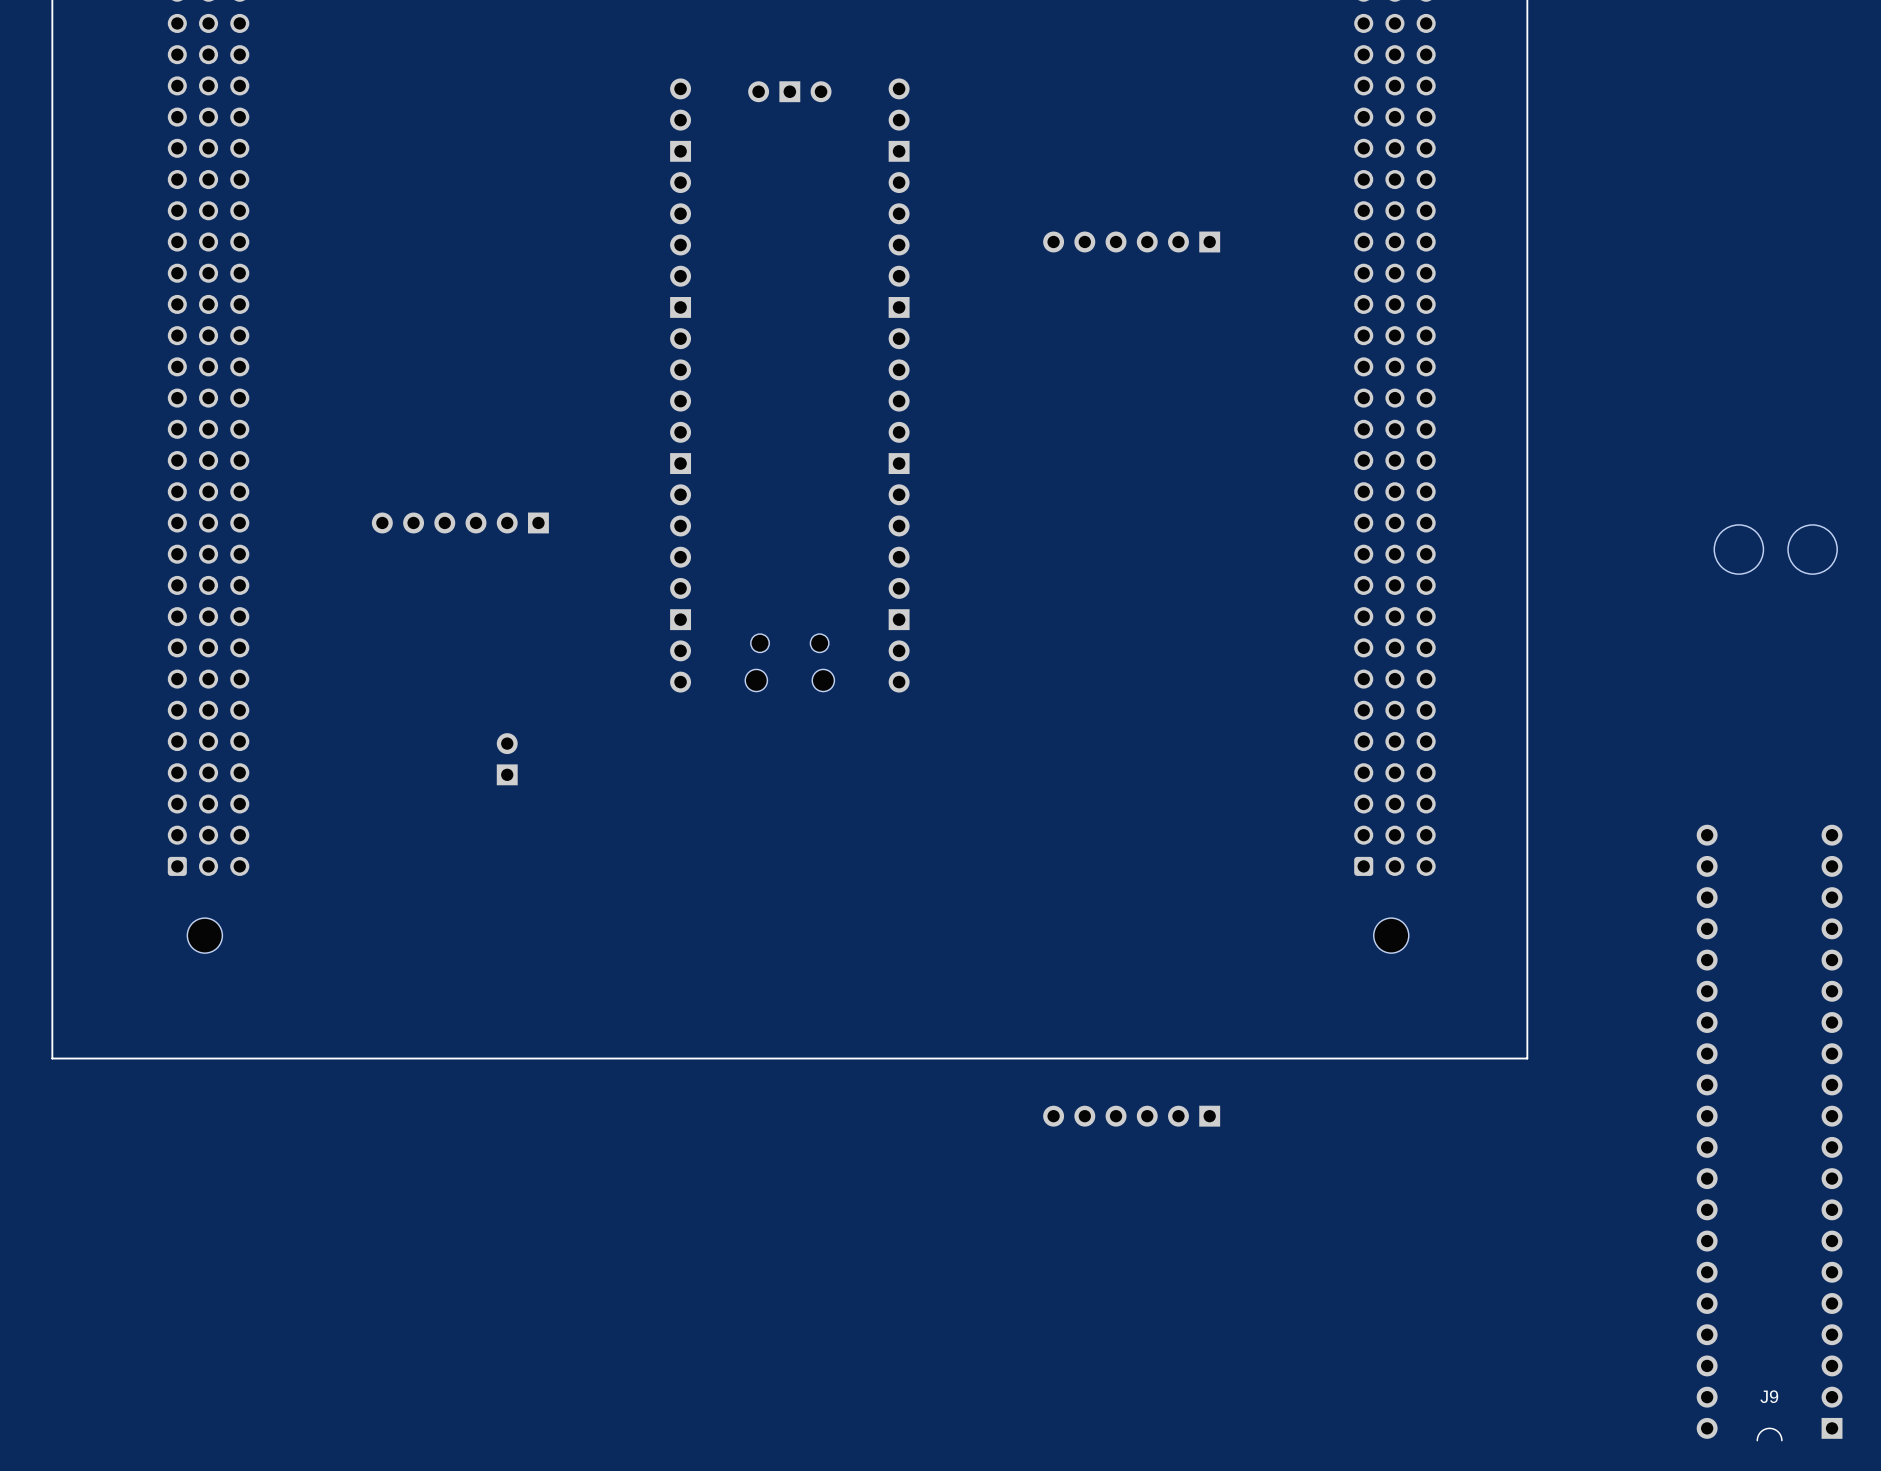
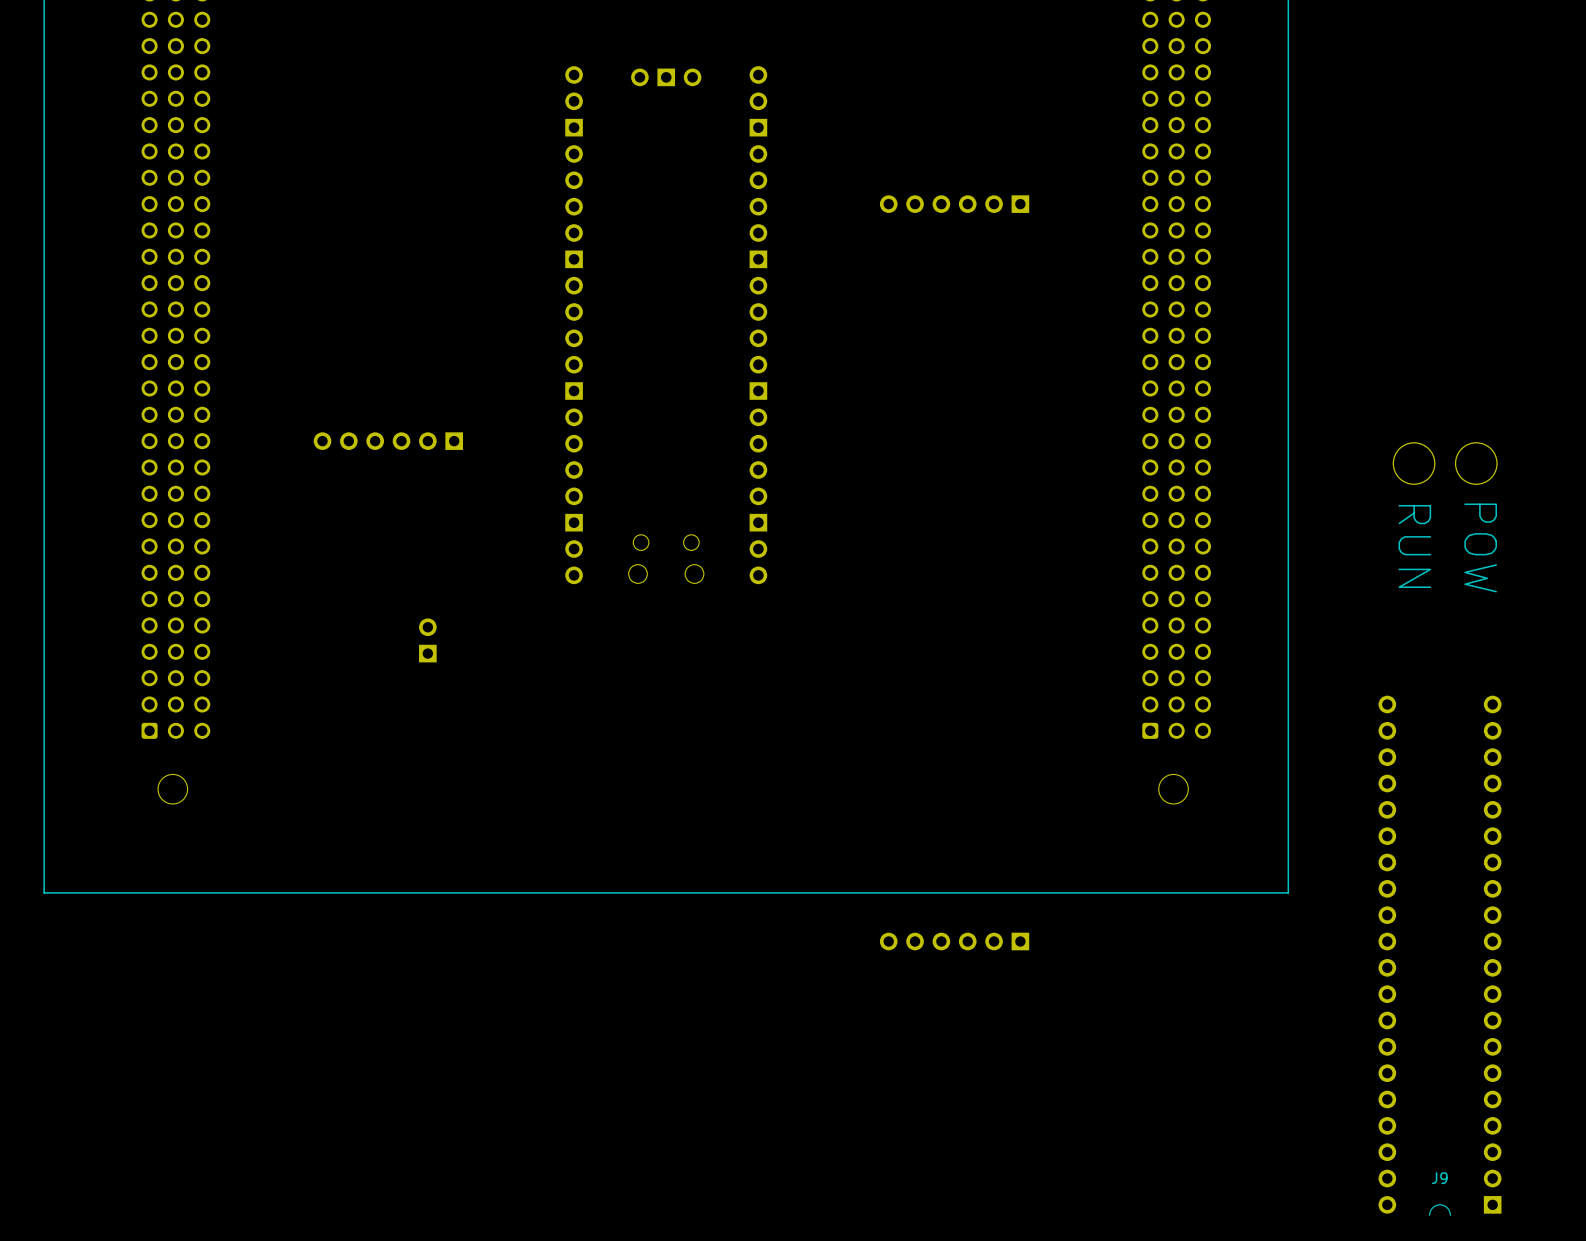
J9 text: none -> RUN (1414, 546)
J9 text: none -> POW (1480, 547)
J9 position: (1769, 982) -> (1440, 829)

